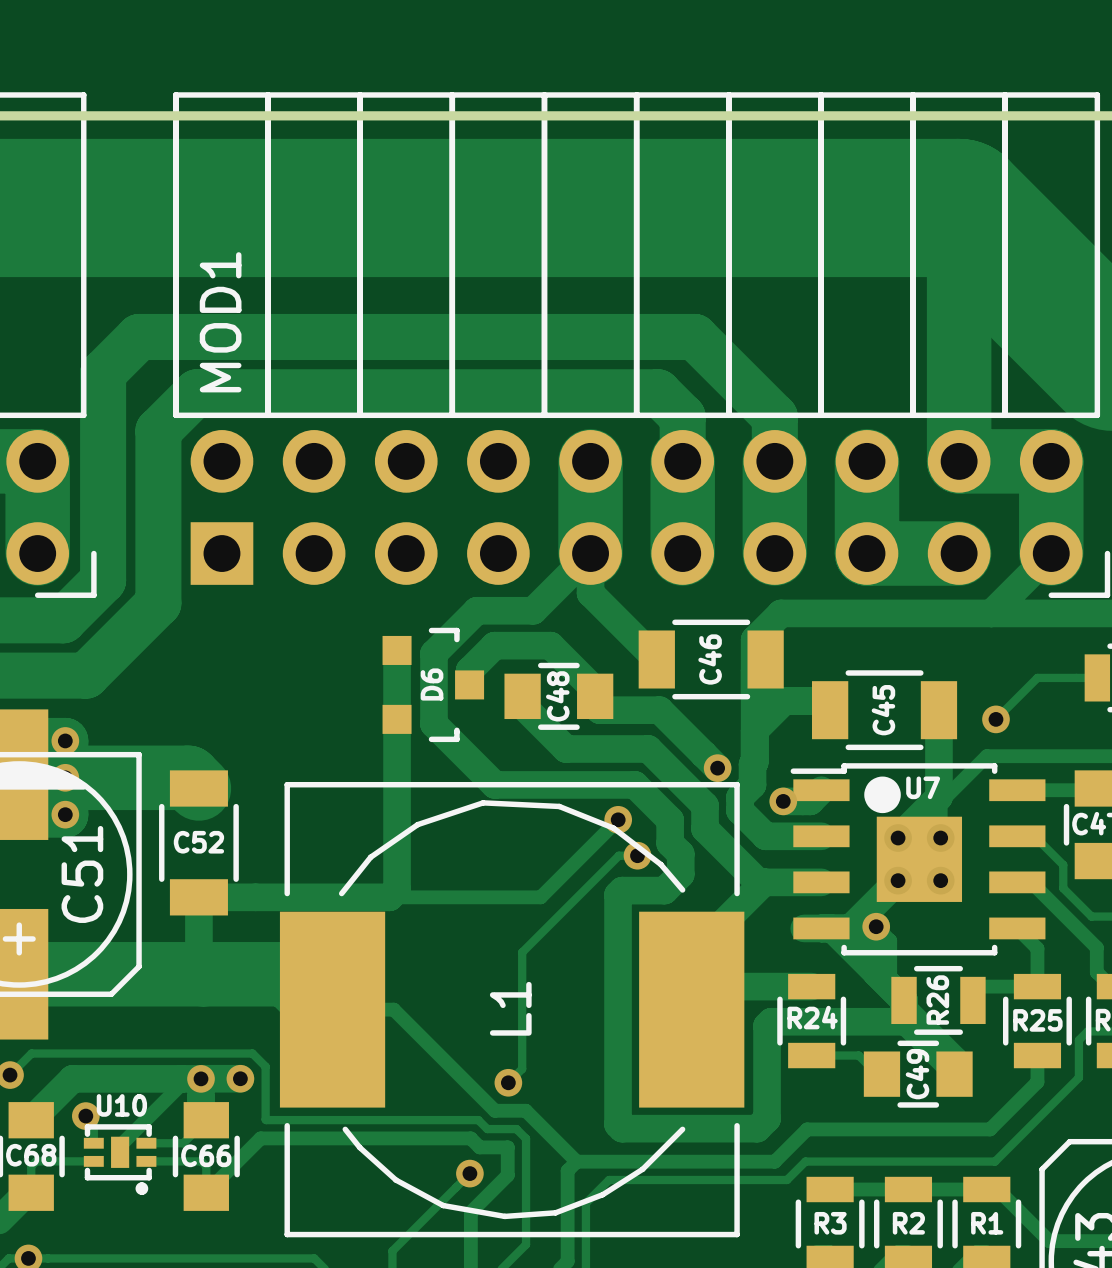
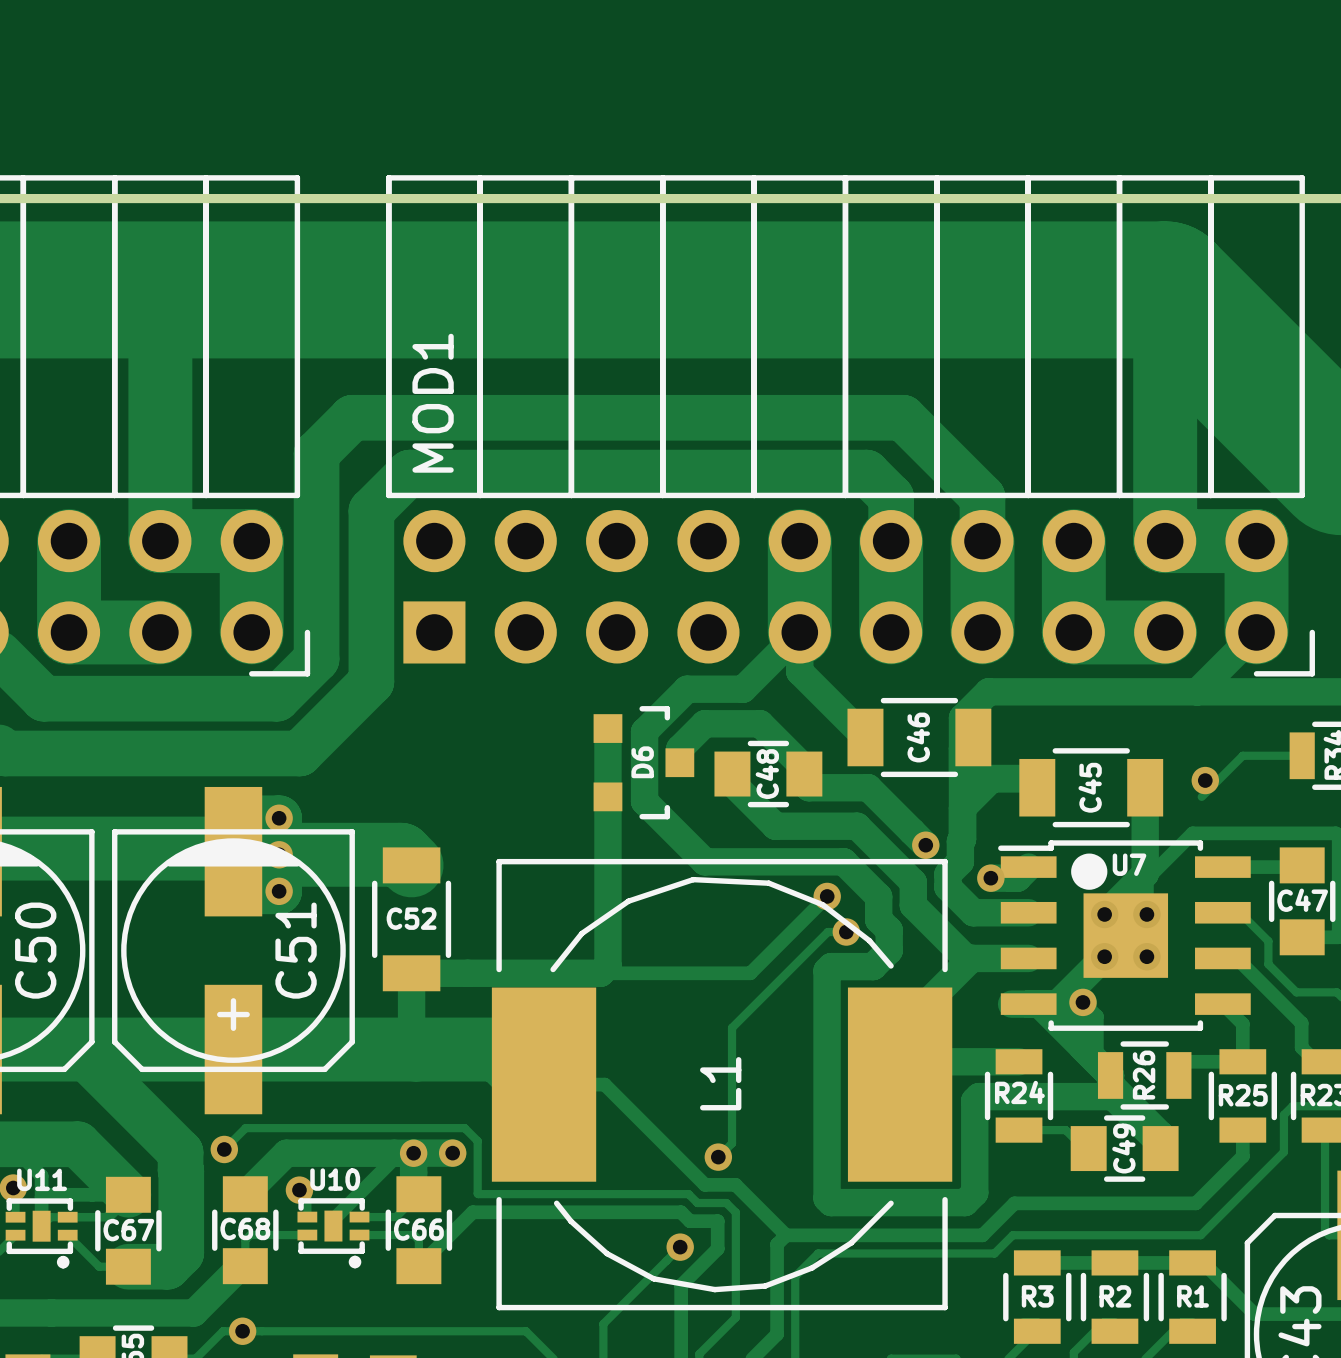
via position: (995, 719) -> (1205, 780)

